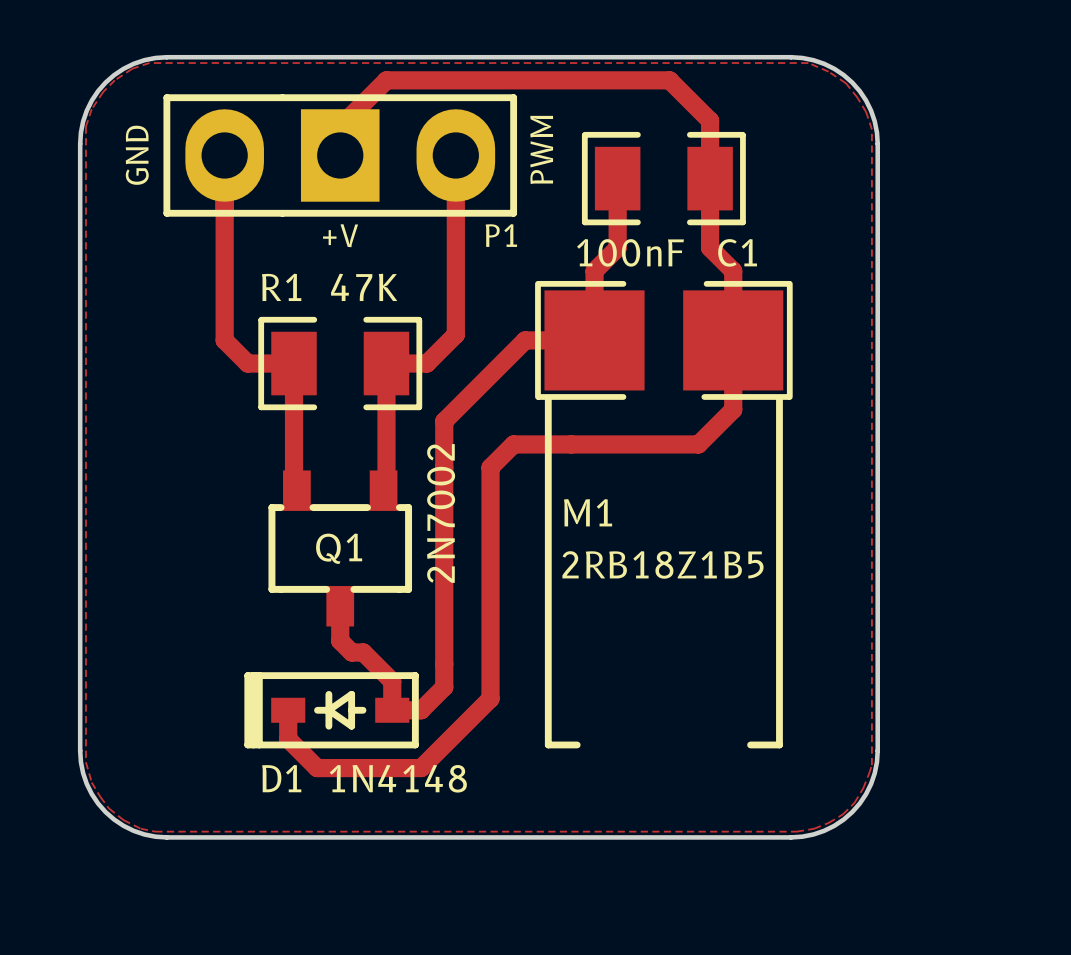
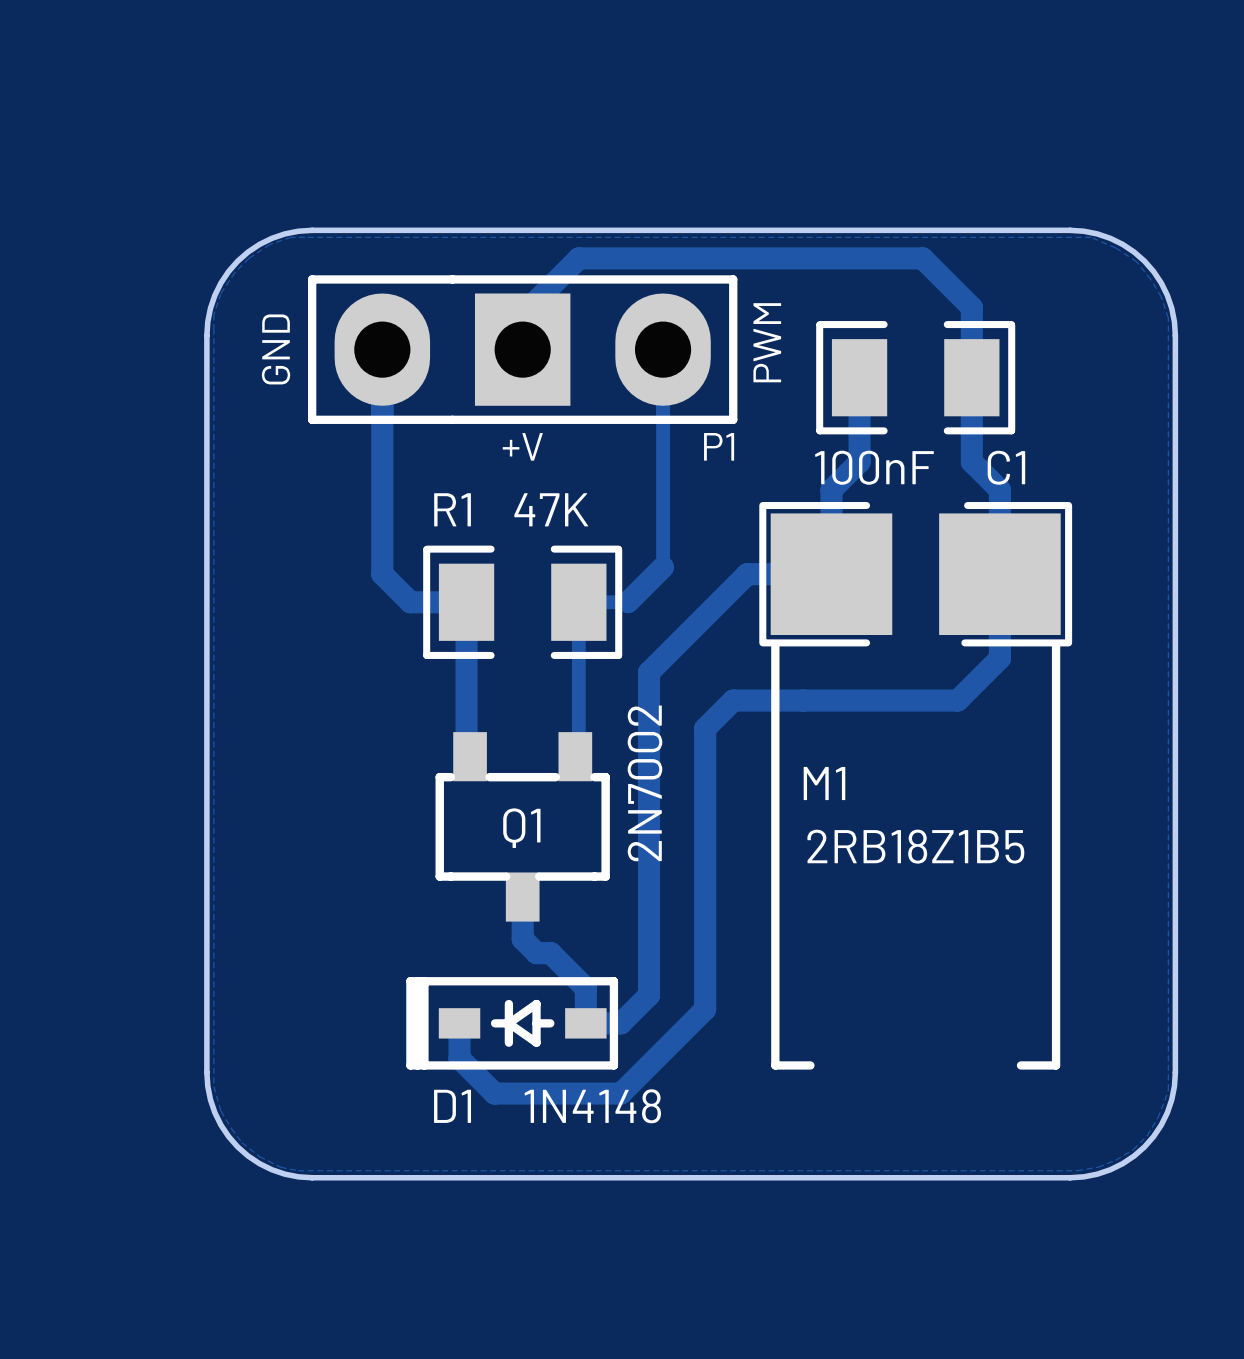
track width: thick (455, 155) (455, 334) -> thin (663, 349) (663, 567)
track width: thick (426, 363) (386, 363) (386, 487) -> thin (627, 602) (578, 602) (578, 753)

